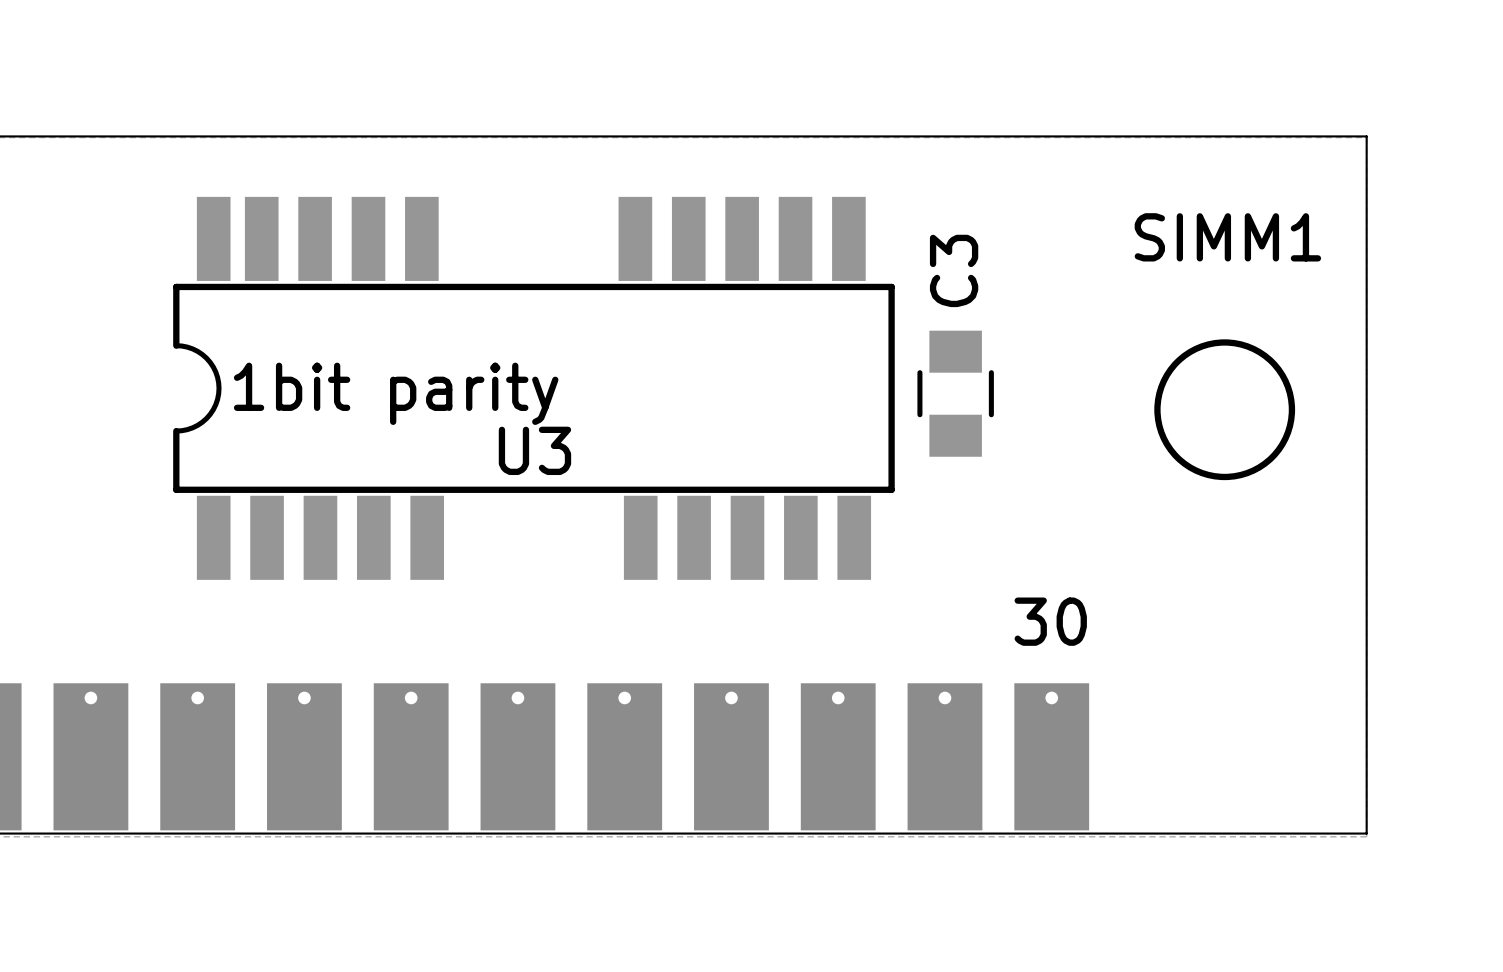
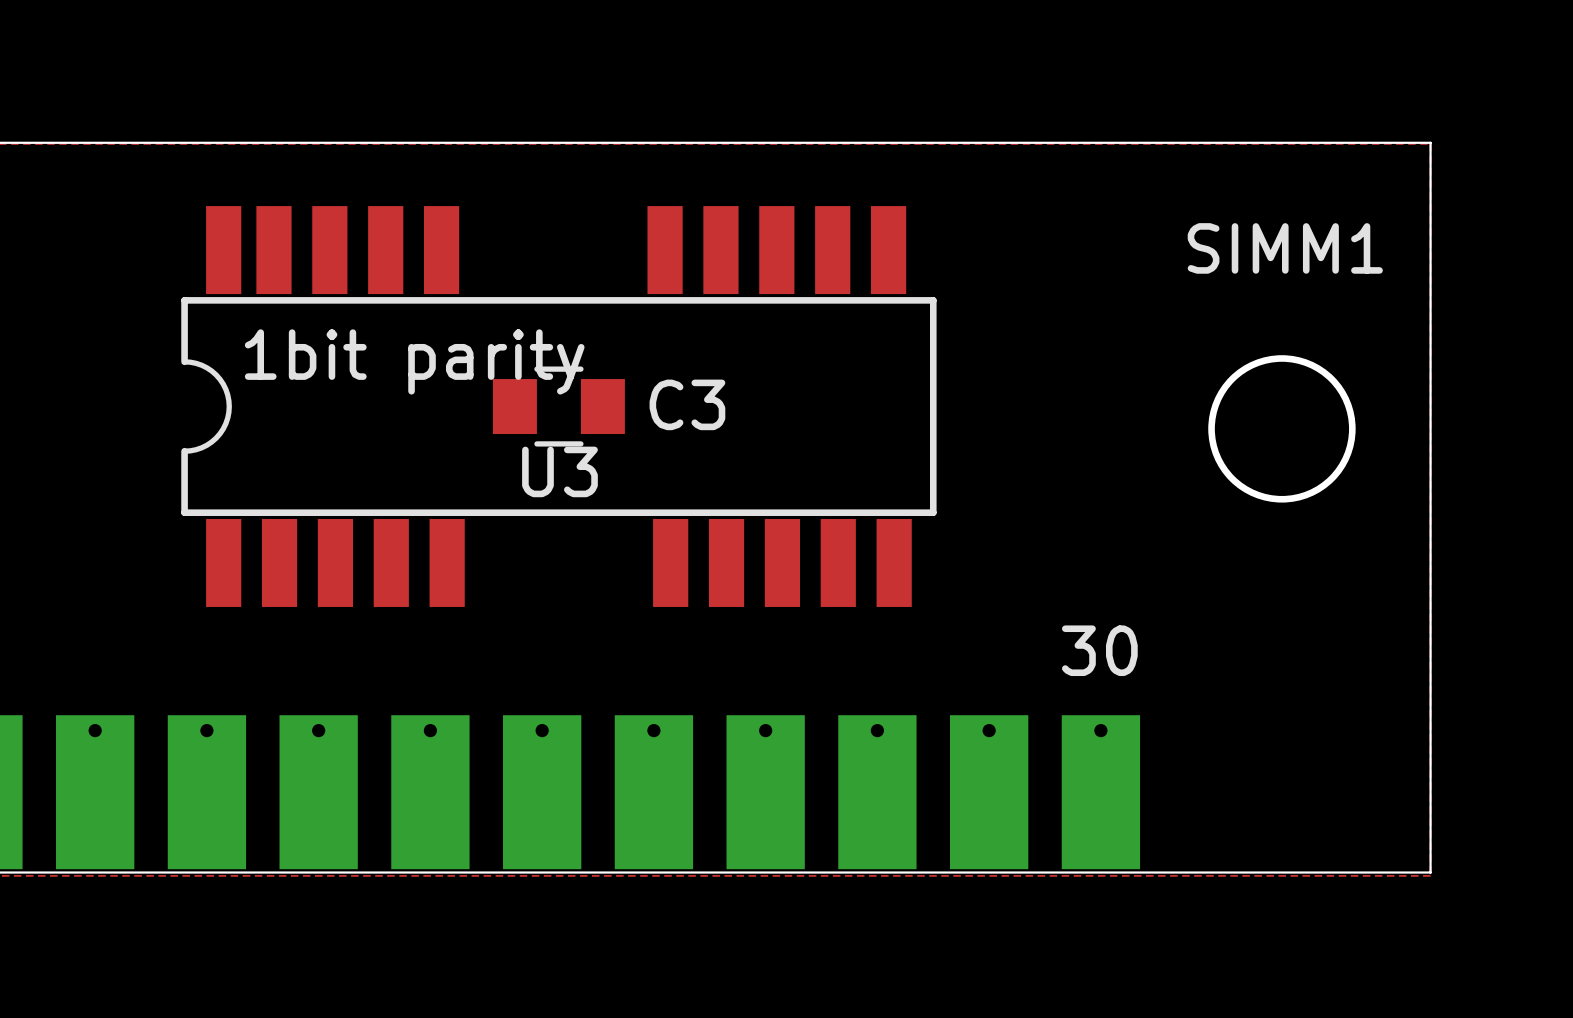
text position: 1bit parity (396, 393) -> 1bit parity (414, 361)
C3 rotation: 0° (955, 393) -> 90° clockwise (558, 406)
C3 position: (955, 393) -> (558, 406)

